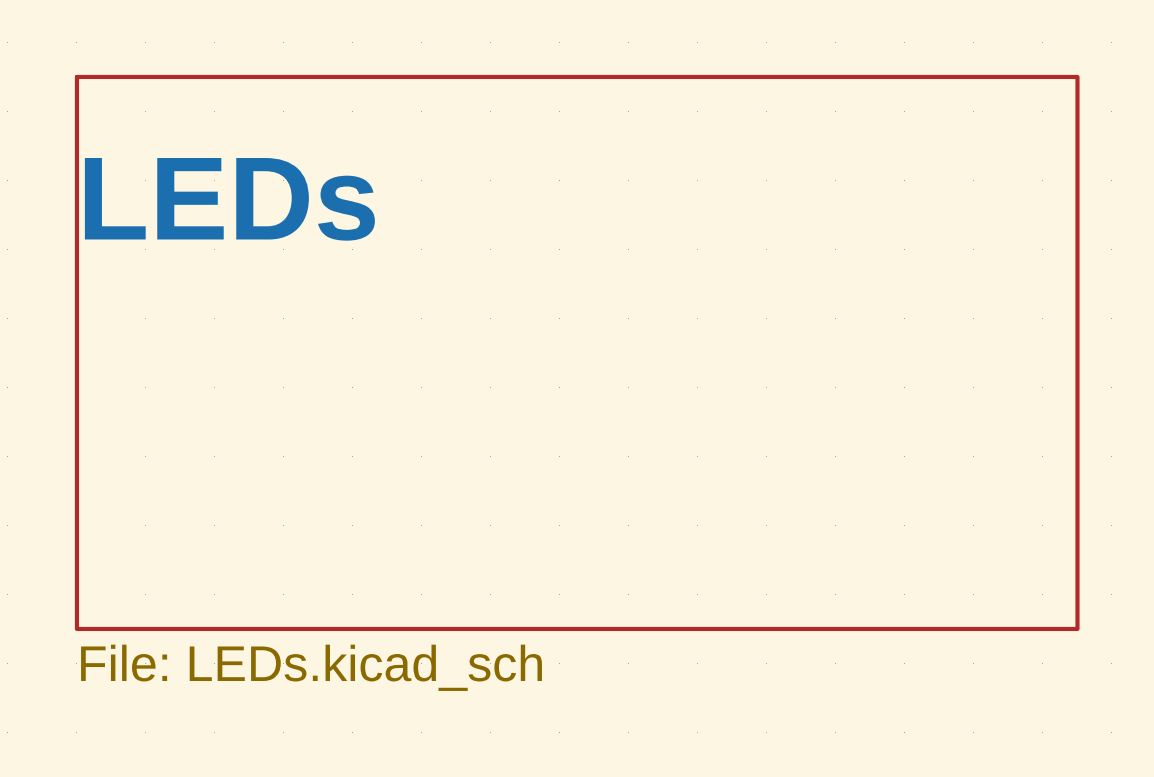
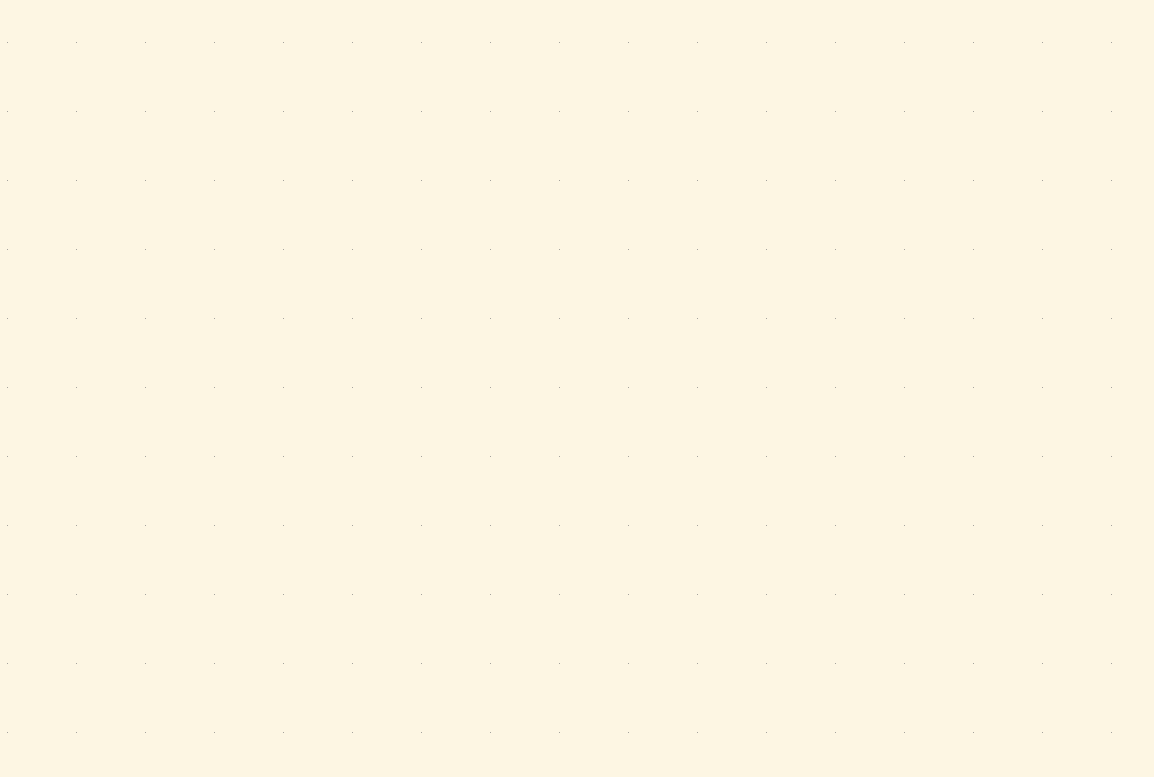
sheet LEDs: File: LEDs.kicad_sch (577, 352) -> none

